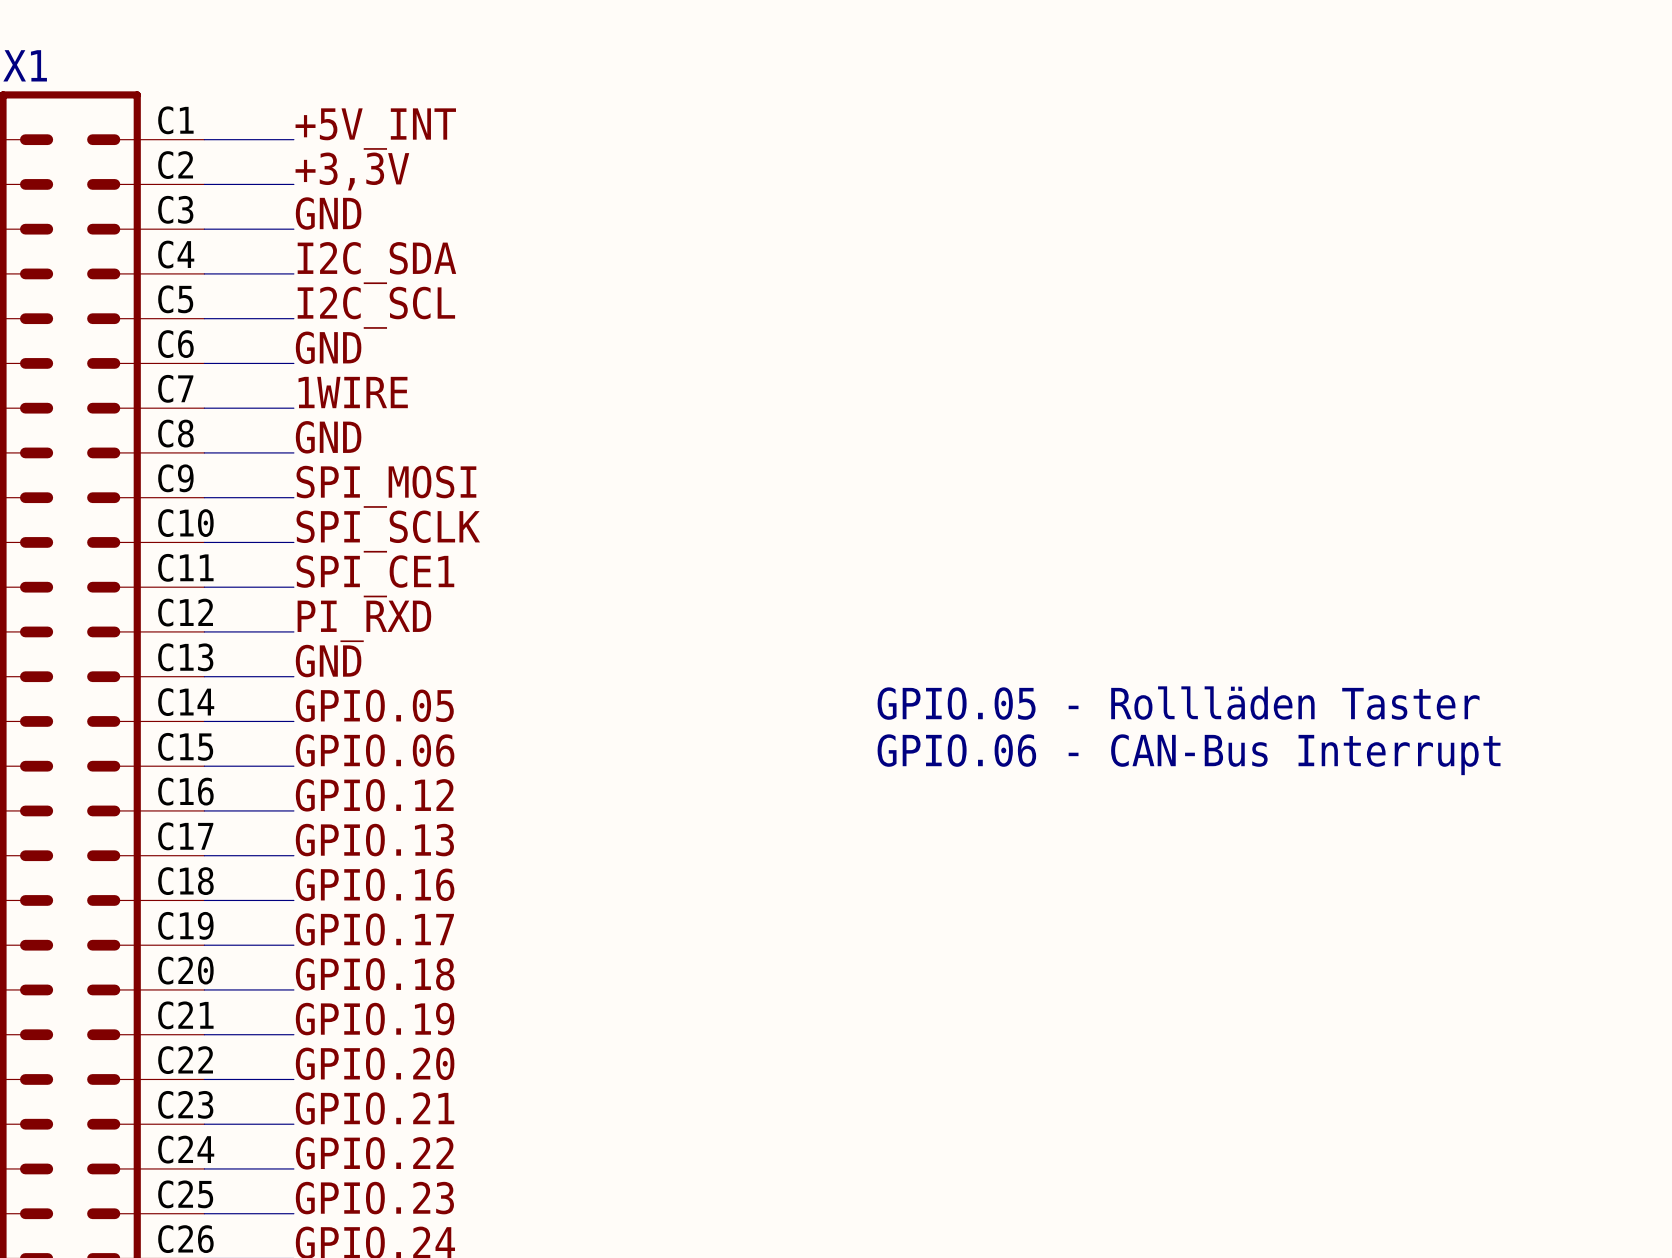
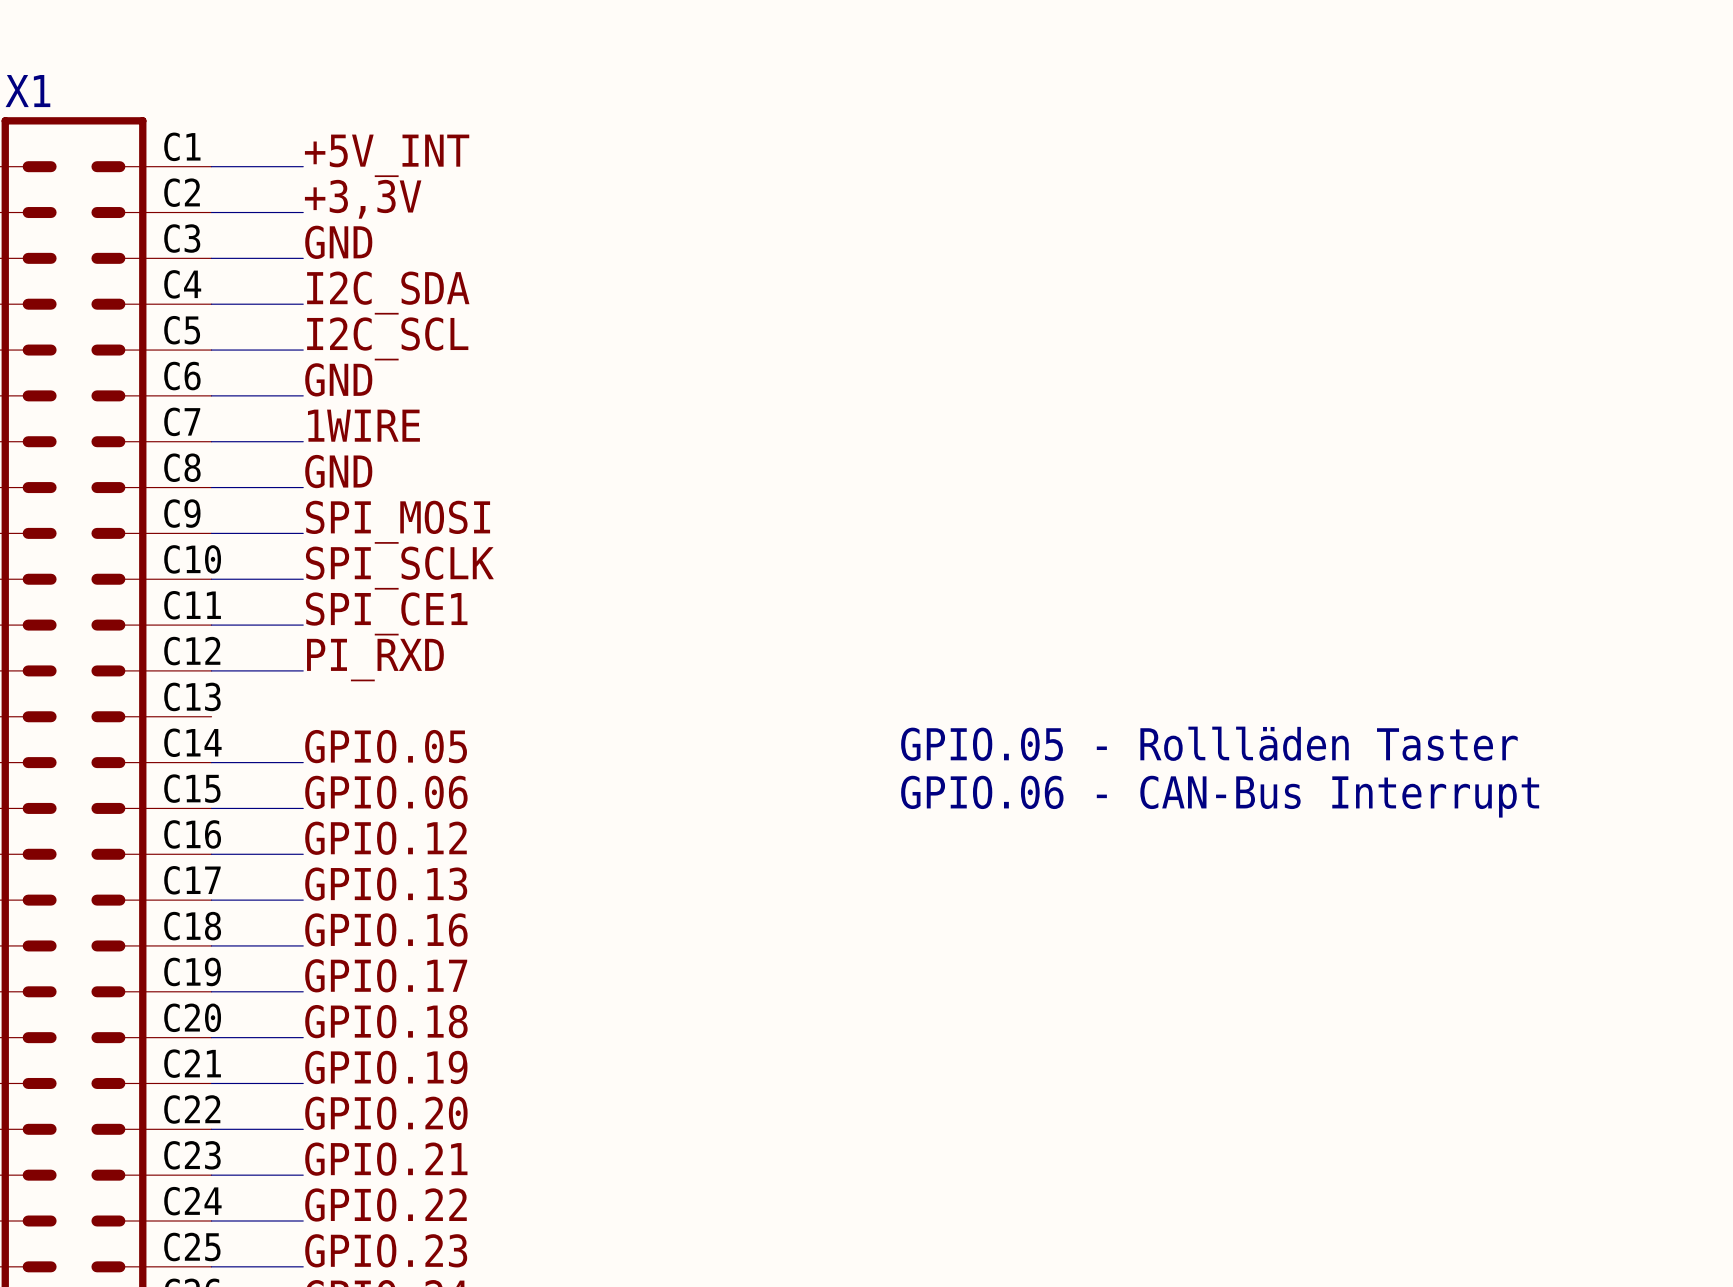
label: GND (328, 661) -> none
wire: (204, 676) (293, 676) -> none

